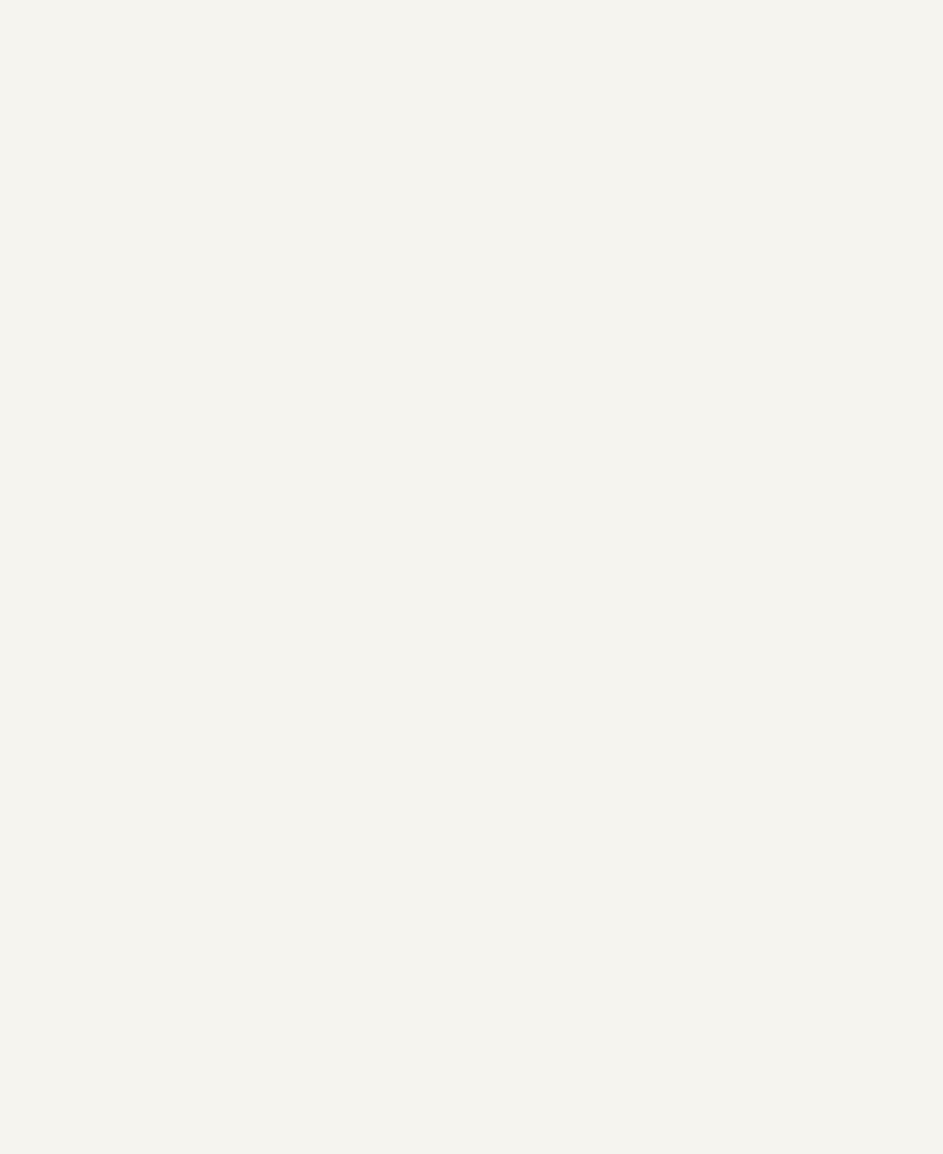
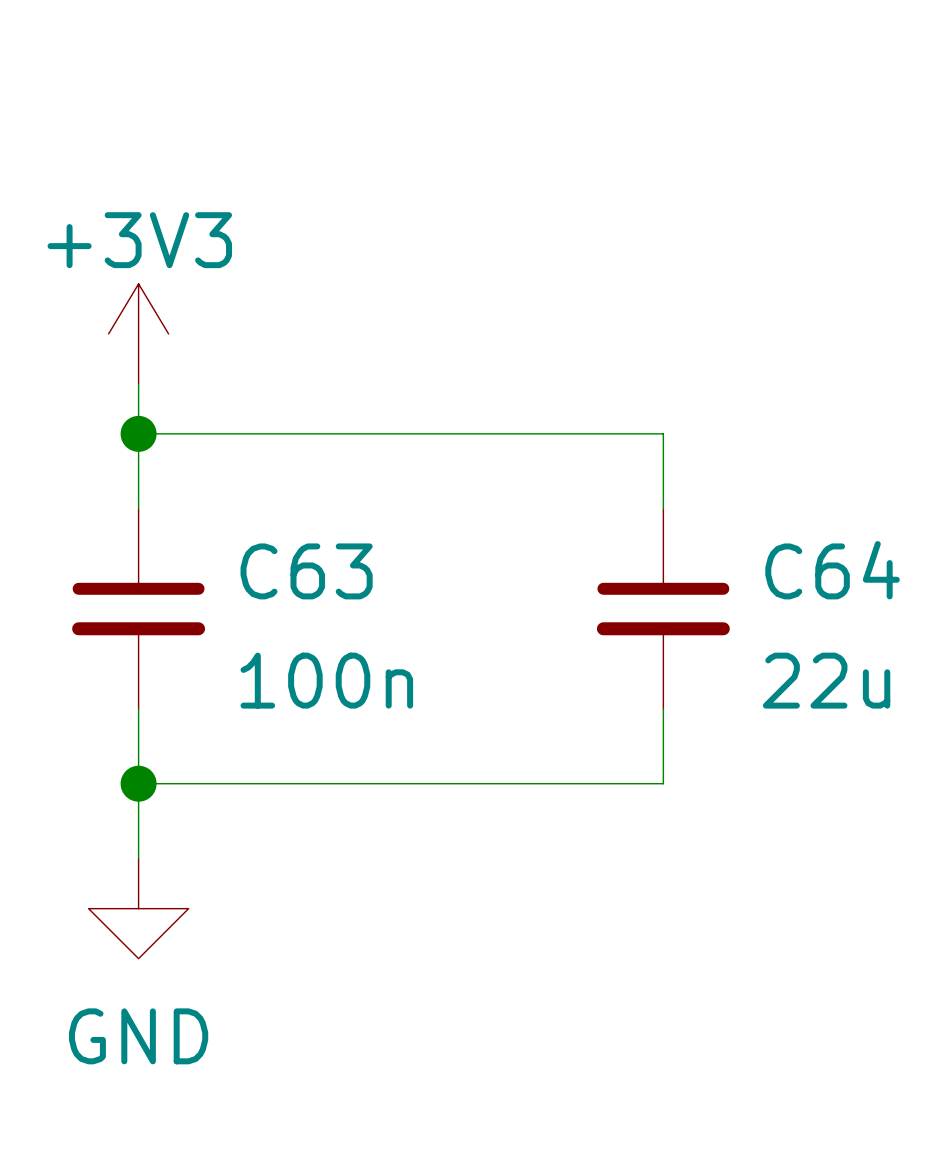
power symbol: none -> +3V3 (138, 333)
wire: none -> (138, 383) (138, 508)
wire: none -> (138, 433) (663, 433) (663, 508)
junction: none -> (138, 433)
C63: none -> 100n (138, 608)
C64: none -> 22u (663, 608)
wire: none -> (138, 708) (138, 858)
wire: none -> (663, 708) (663, 783) (138, 783)
junction: none -> (138, 783)
power symbol: none -> GND (138, 908)

